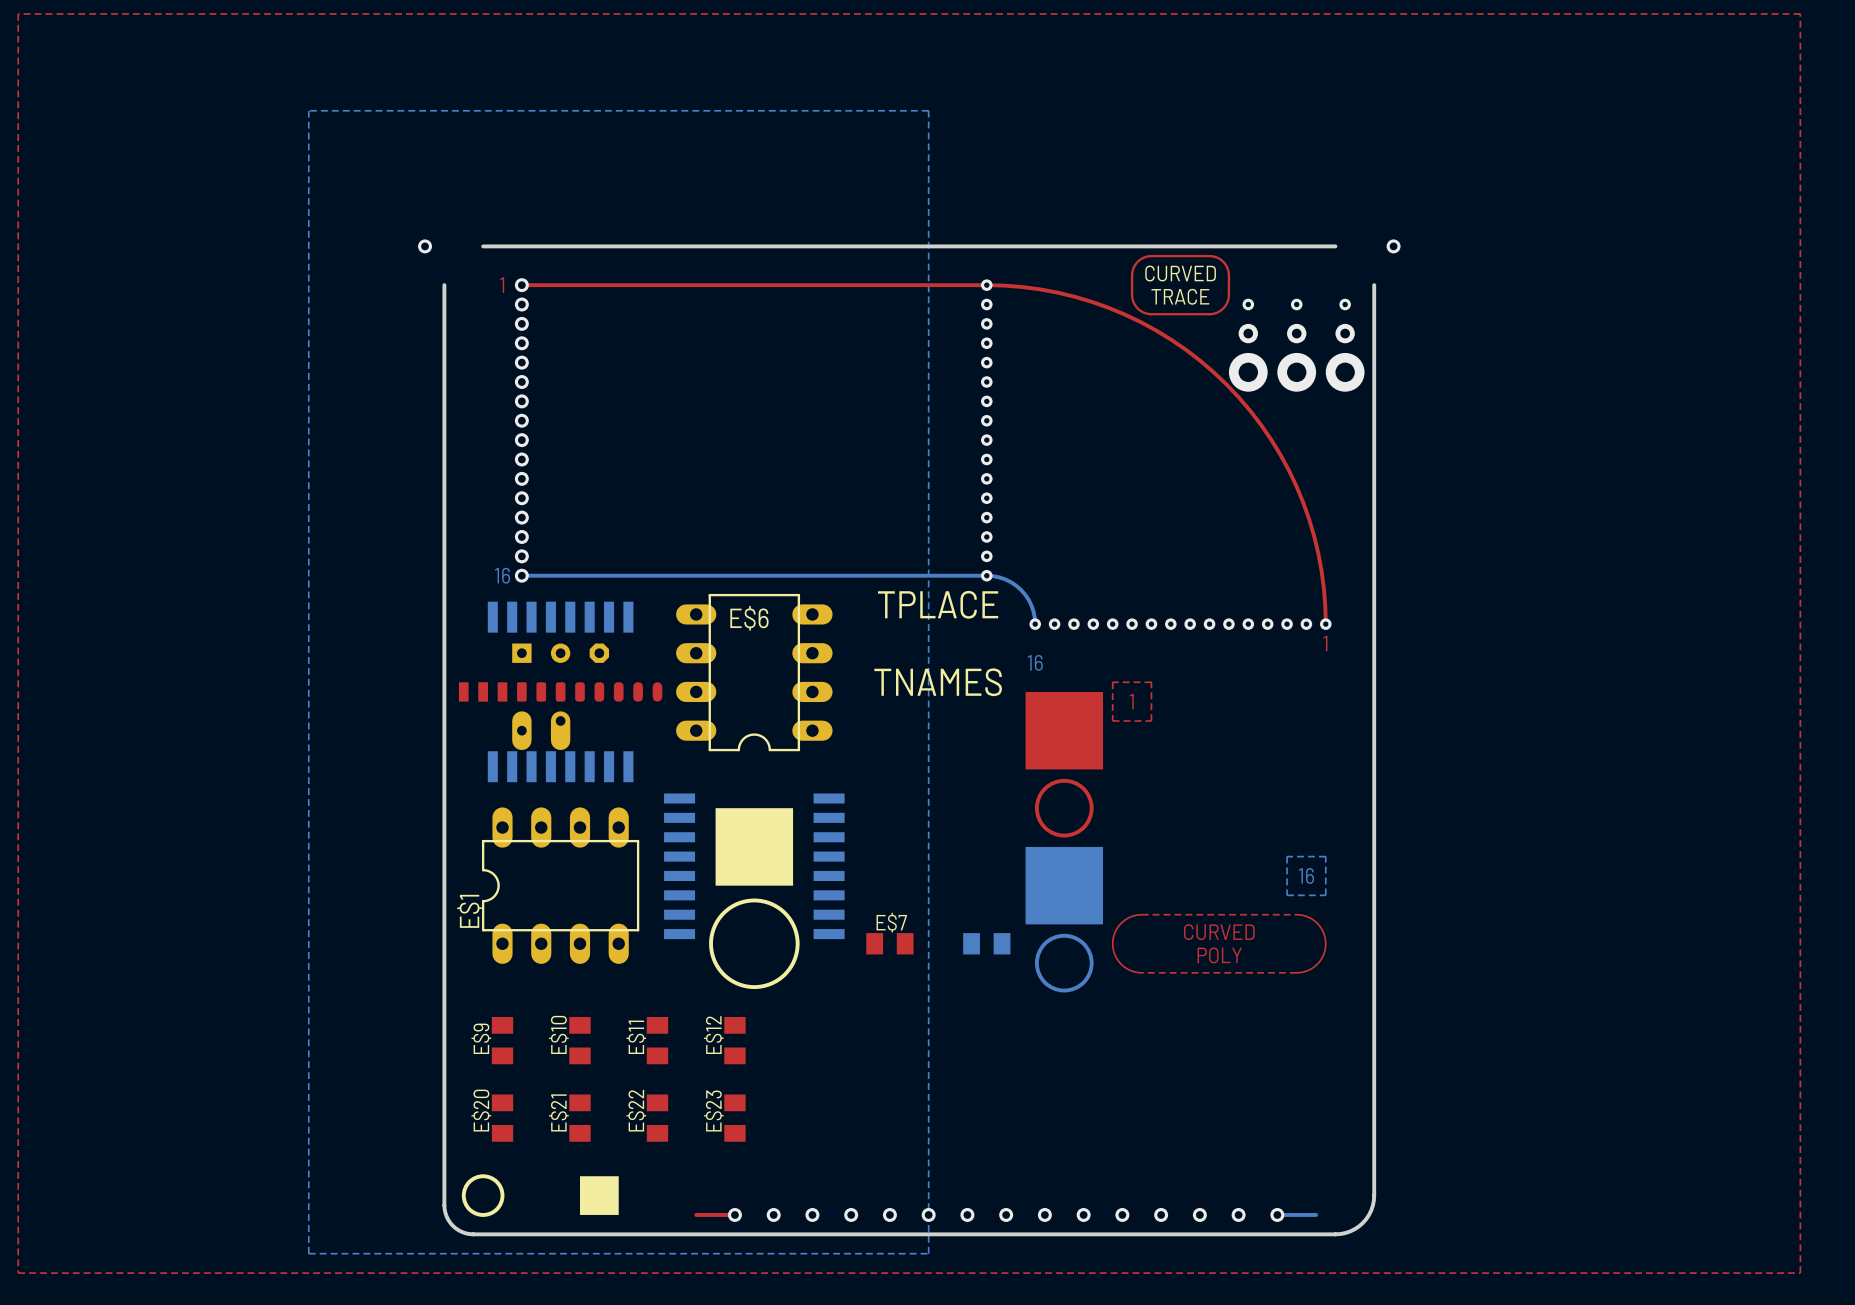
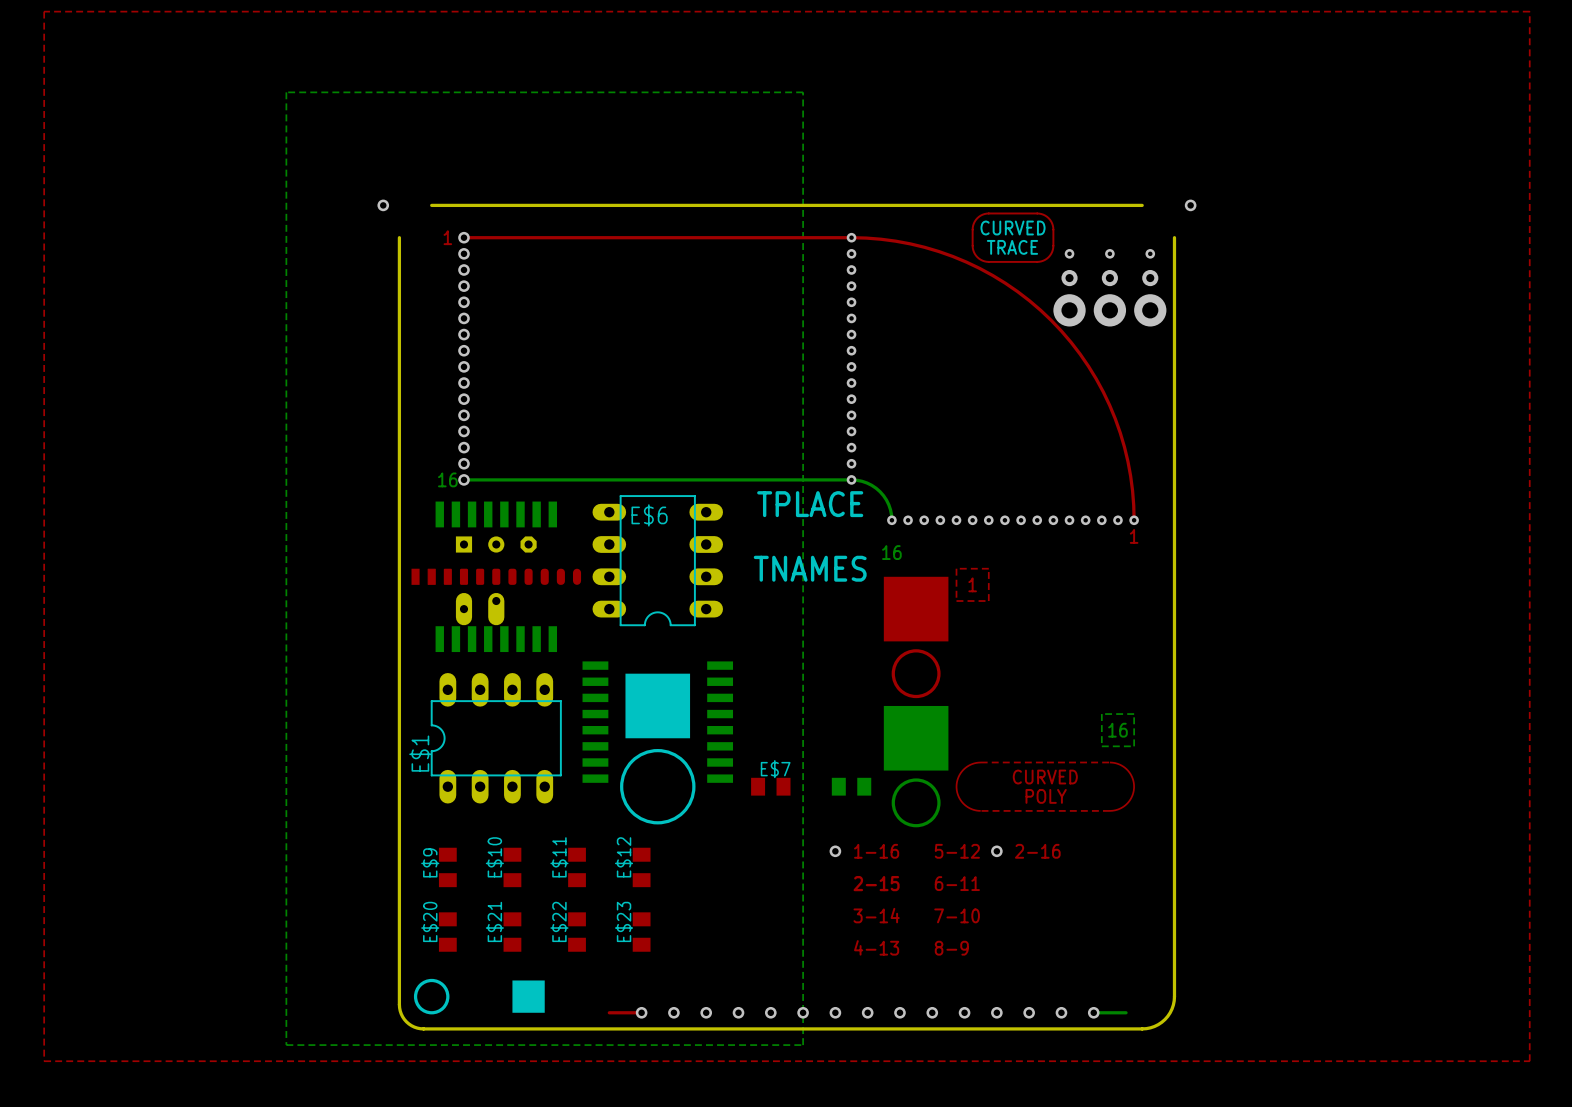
via: none -> (835, 851)
text: none -> 1-16 (876, 851)
text: none -> 5-12 (957, 851)
via: none -> (996, 851)
text: none -> 2-16 (1037, 851)
text: none -> 2-15 (876, 883)
text: none -> 6-11 (957, 883)
text: none -> 3-14 (876, 915)
text: none -> 7-10 (957, 915)
text: none -> 4-13 (876, 947)
text: none -> 8-9 (951, 948)

